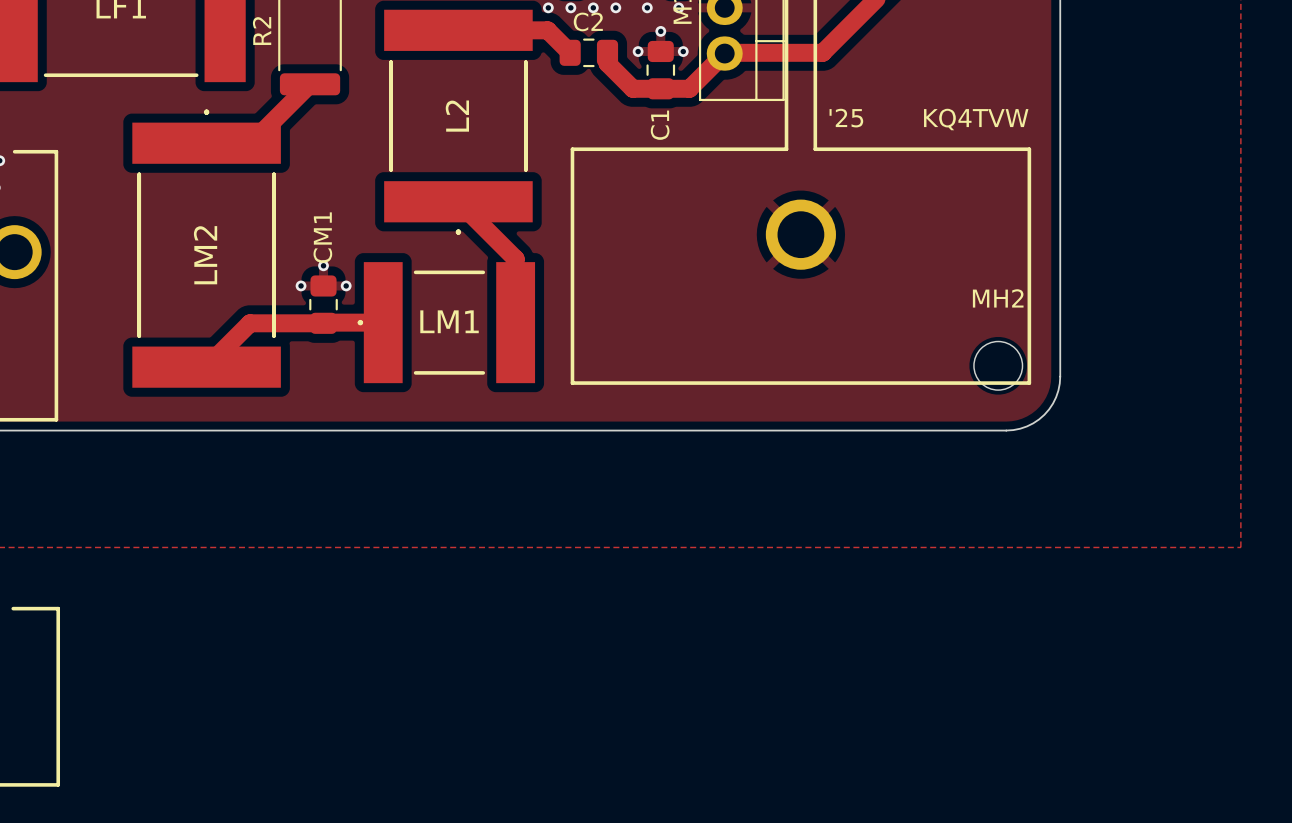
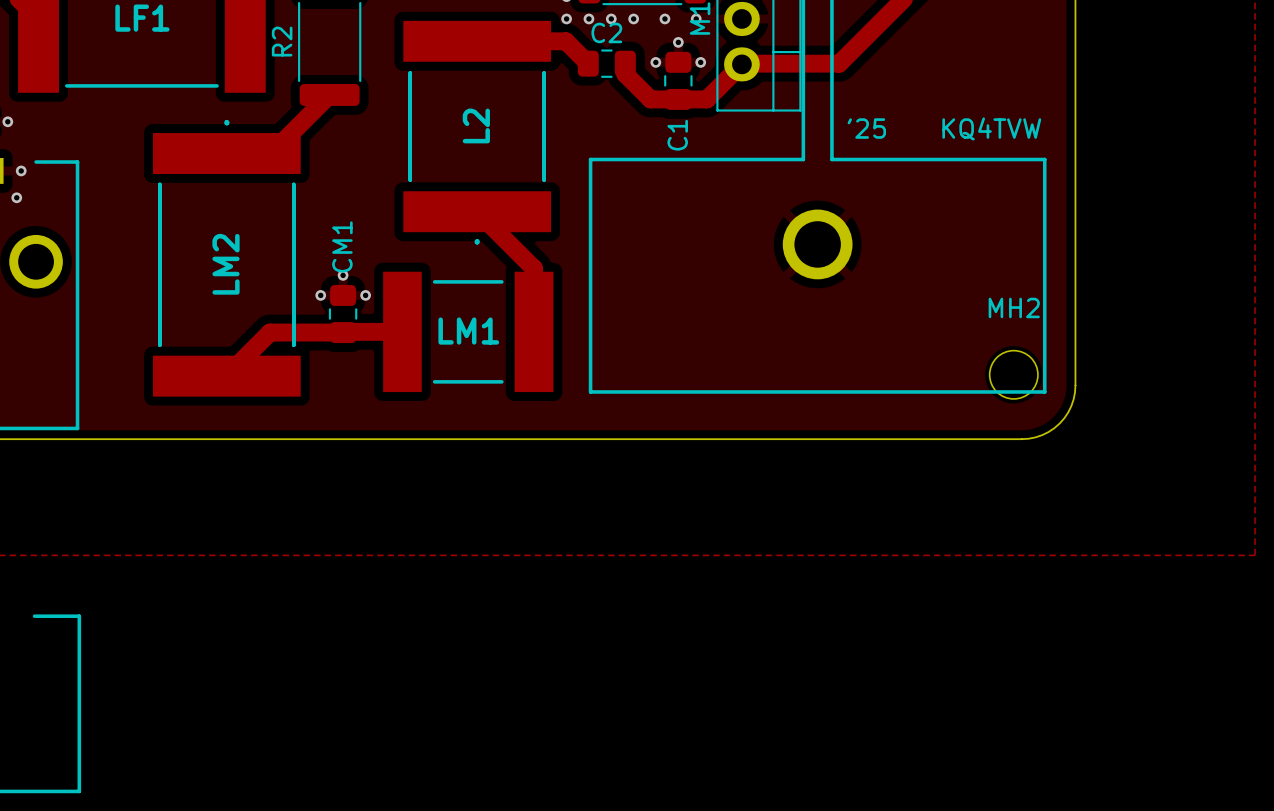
LM1 footprint: [357, 262, 536, 384] -> [383, 271, 554, 393]

